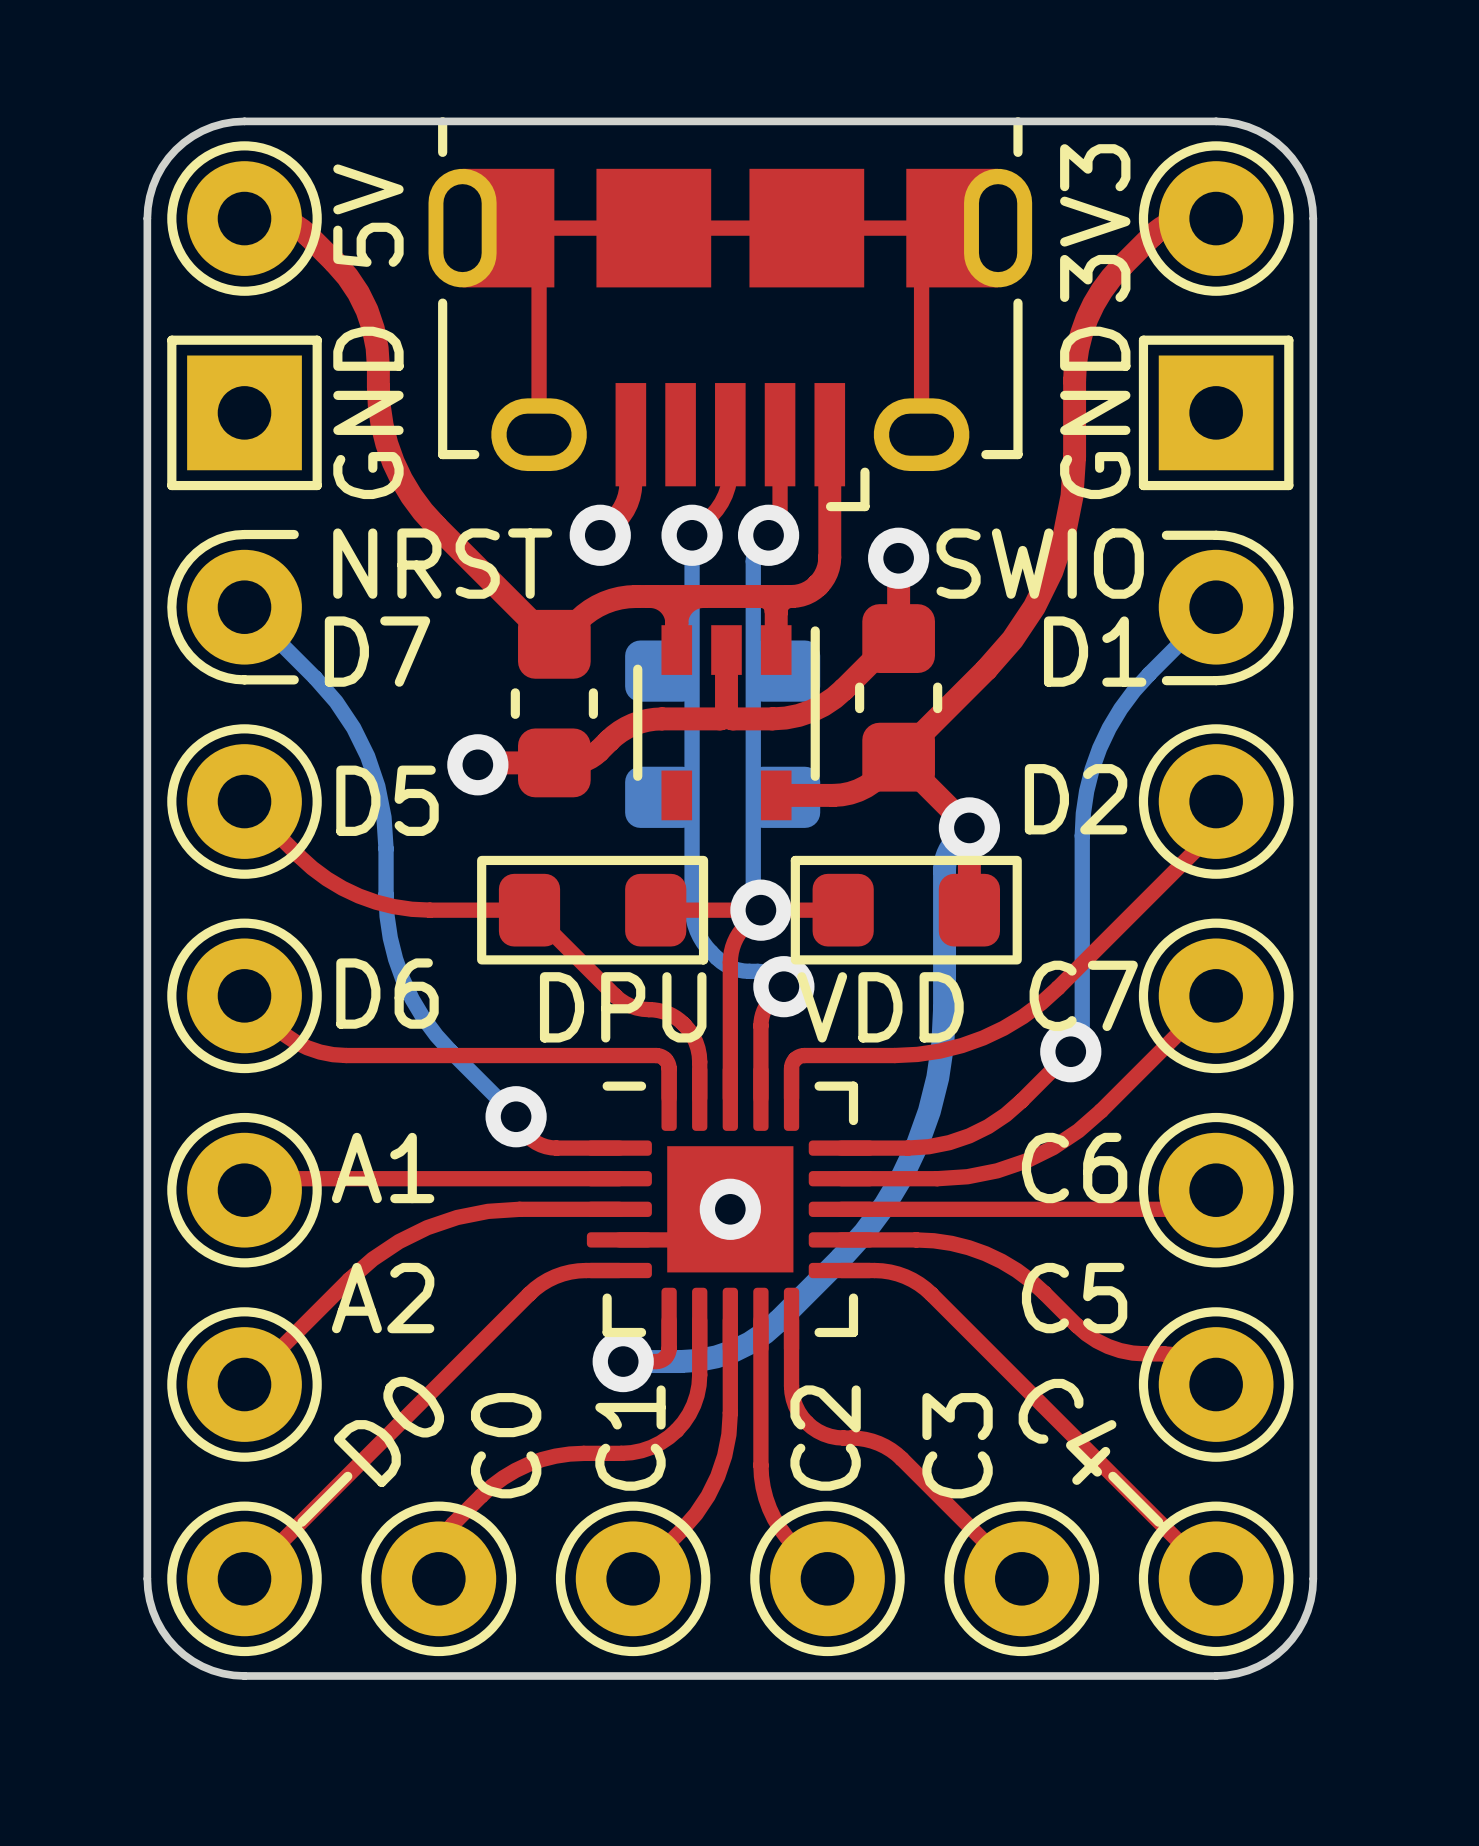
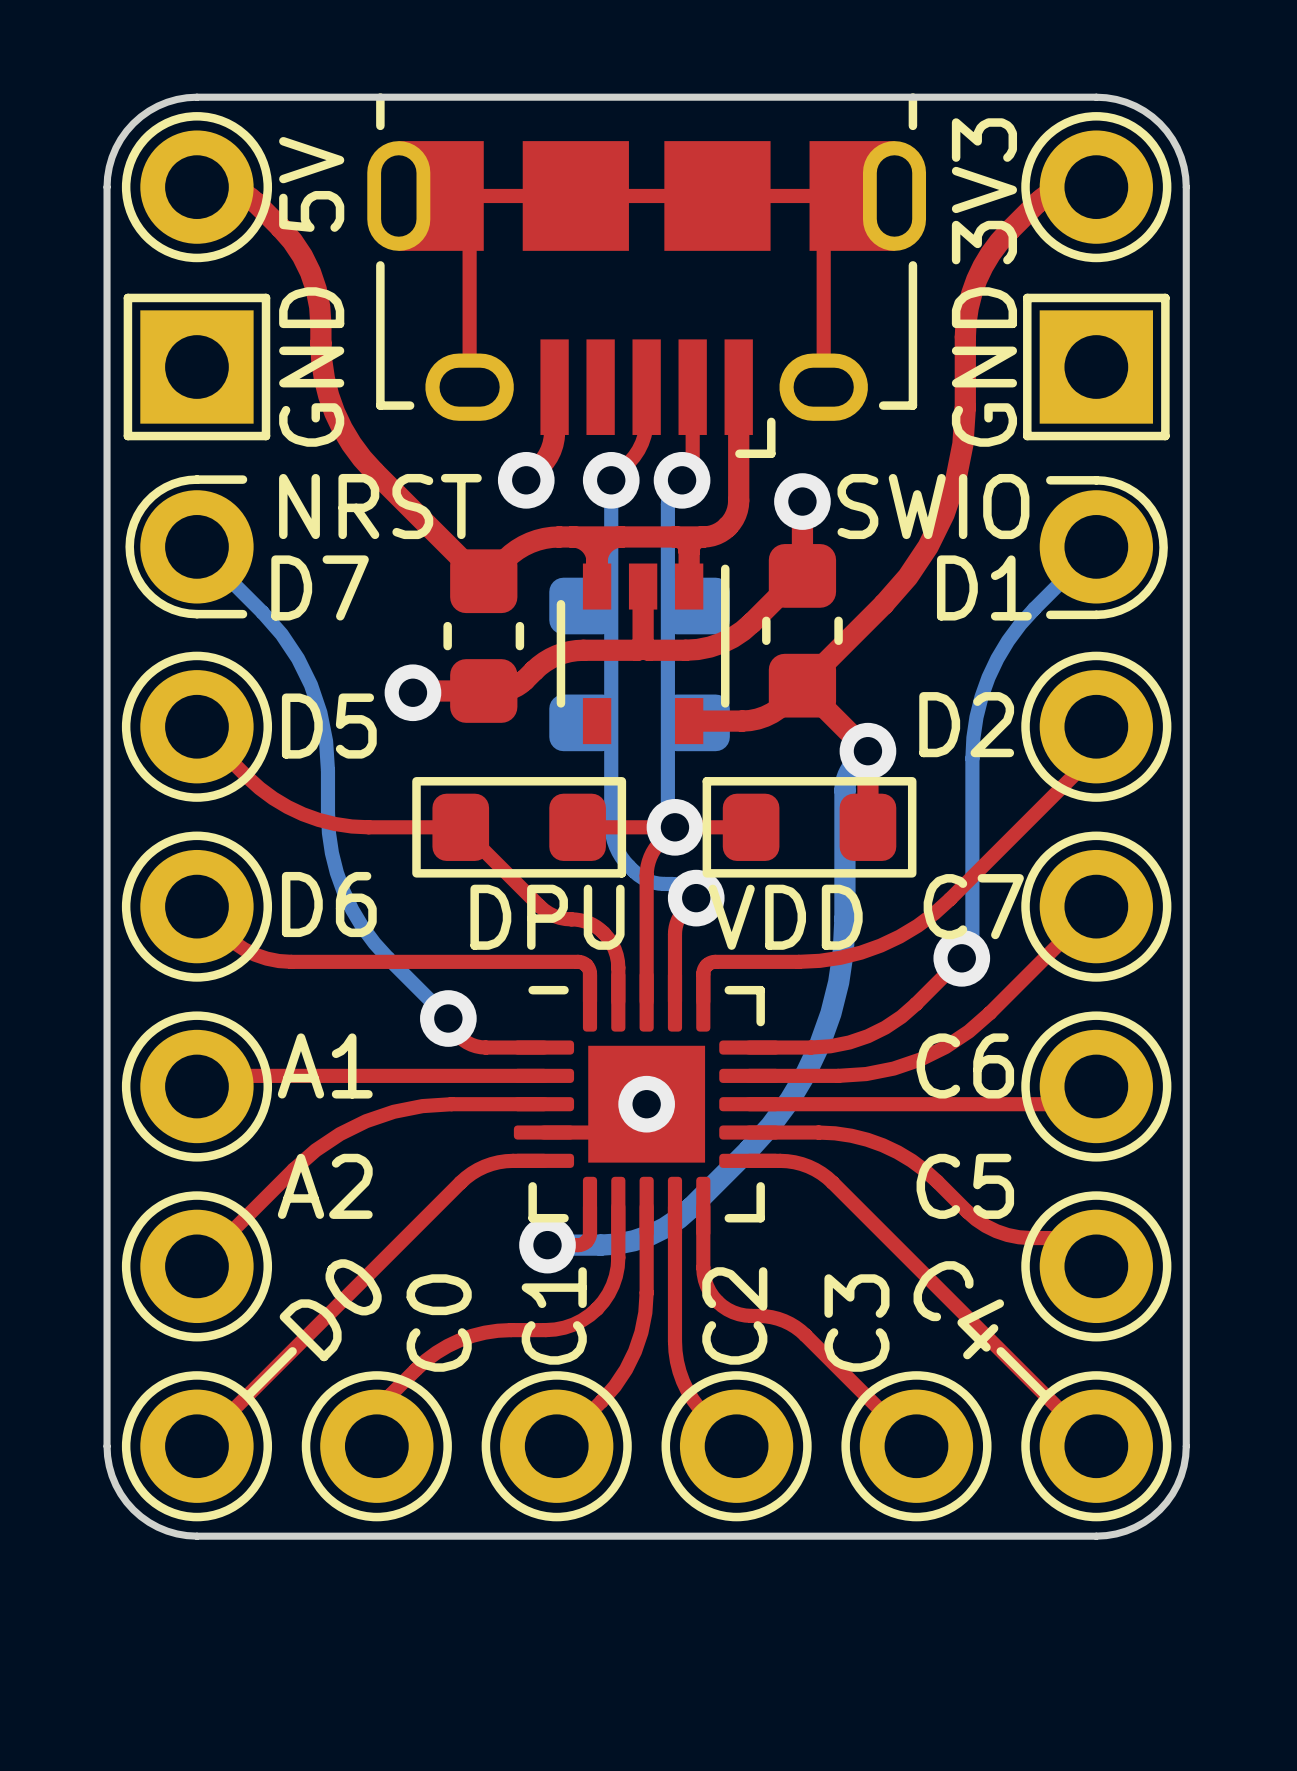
part footprint: [167, 141, 322, 296] -> [121, 112, 273, 263]
part footprint: [1138, 141, 1294, 296] -> [1021, 112, 1172, 263]
part footprint: [167, 335, 322, 491] -> [123, 293, 271, 441]
part footprint: [1138, 335, 1294, 491] -> [1023, 293, 1170, 441]
part footprint: [187, 549, 302, 665] -> [140, 490, 254, 604]
part footprint: [1158, 549, 1274, 665] -> [1039, 490, 1153, 604]
part footprint: [167, 724, 322, 879] -> [121, 651, 273, 802]
part footprint: [1138, 724, 1294, 879] -> [1021, 651, 1172, 802]
part footprint: [167, 918, 322, 1074] -> [121, 831, 273, 982]
part footprint: [1138, 918, 1294, 1074] -> [1021, 831, 1172, 982]
part footprint: [167, 1112, 322, 1268] -> [121, 1011, 273, 1162]
part footprint: [1138, 1112, 1294, 1268] -> [1021, 1011, 1172, 1162]
part footprint: [167, 1307, 322, 1462] -> [121, 1191, 273, 1342]
part footprint: [1138, 1307, 1294, 1462] -> [1021, 1191, 1172, 1342]
part footprint: [167, 1501, 322, 1657] -> [121, 1371, 273, 1522]
part footprint: [361, 1501, 517, 1657] -> [301, 1371, 452, 1522]
part footprint: [555, 1501, 711, 1657] -> [481, 1371, 632, 1522]
part footprint: [750, 1501, 905, 1657] -> [661, 1371, 812, 1522]
part footprint: [944, 1501, 1100, 1657] -> [841, 1371, 992, 1522]
part footprint: [1138, 1501, 1294, 1657] -> [1021, 1371, 1172, 1522]

